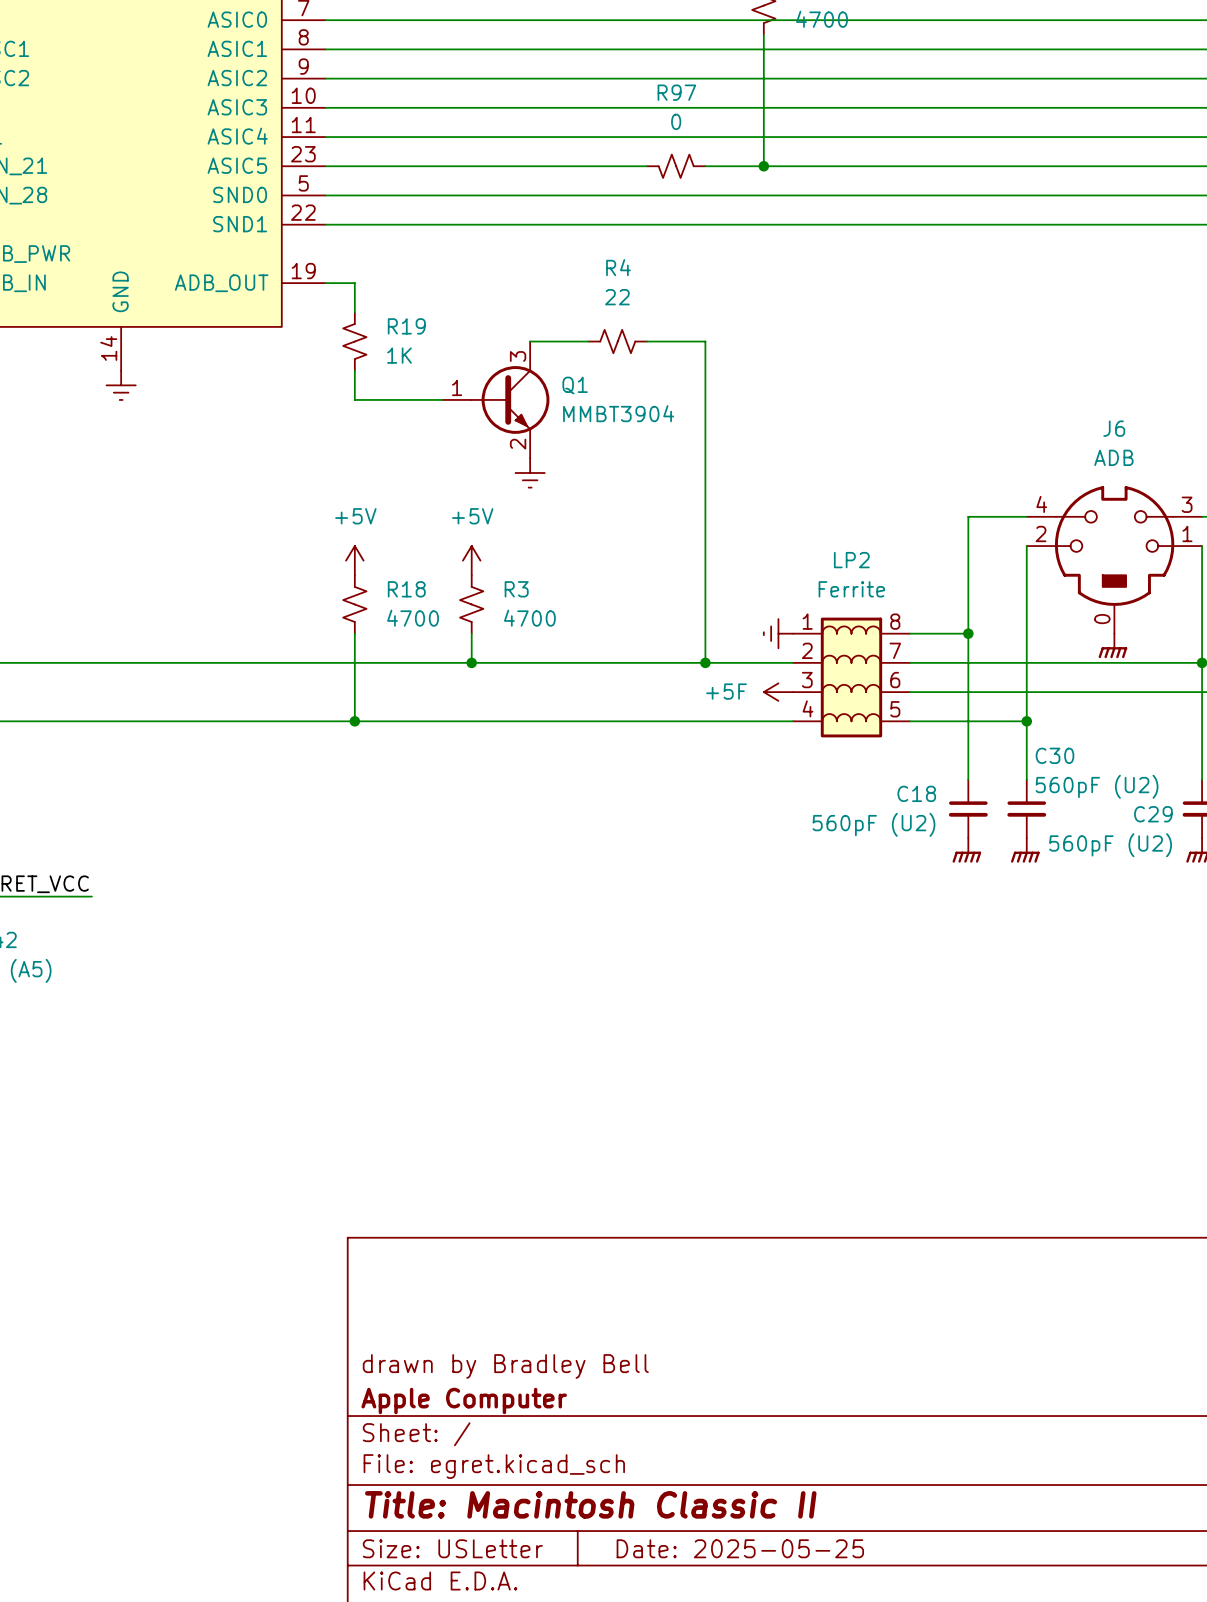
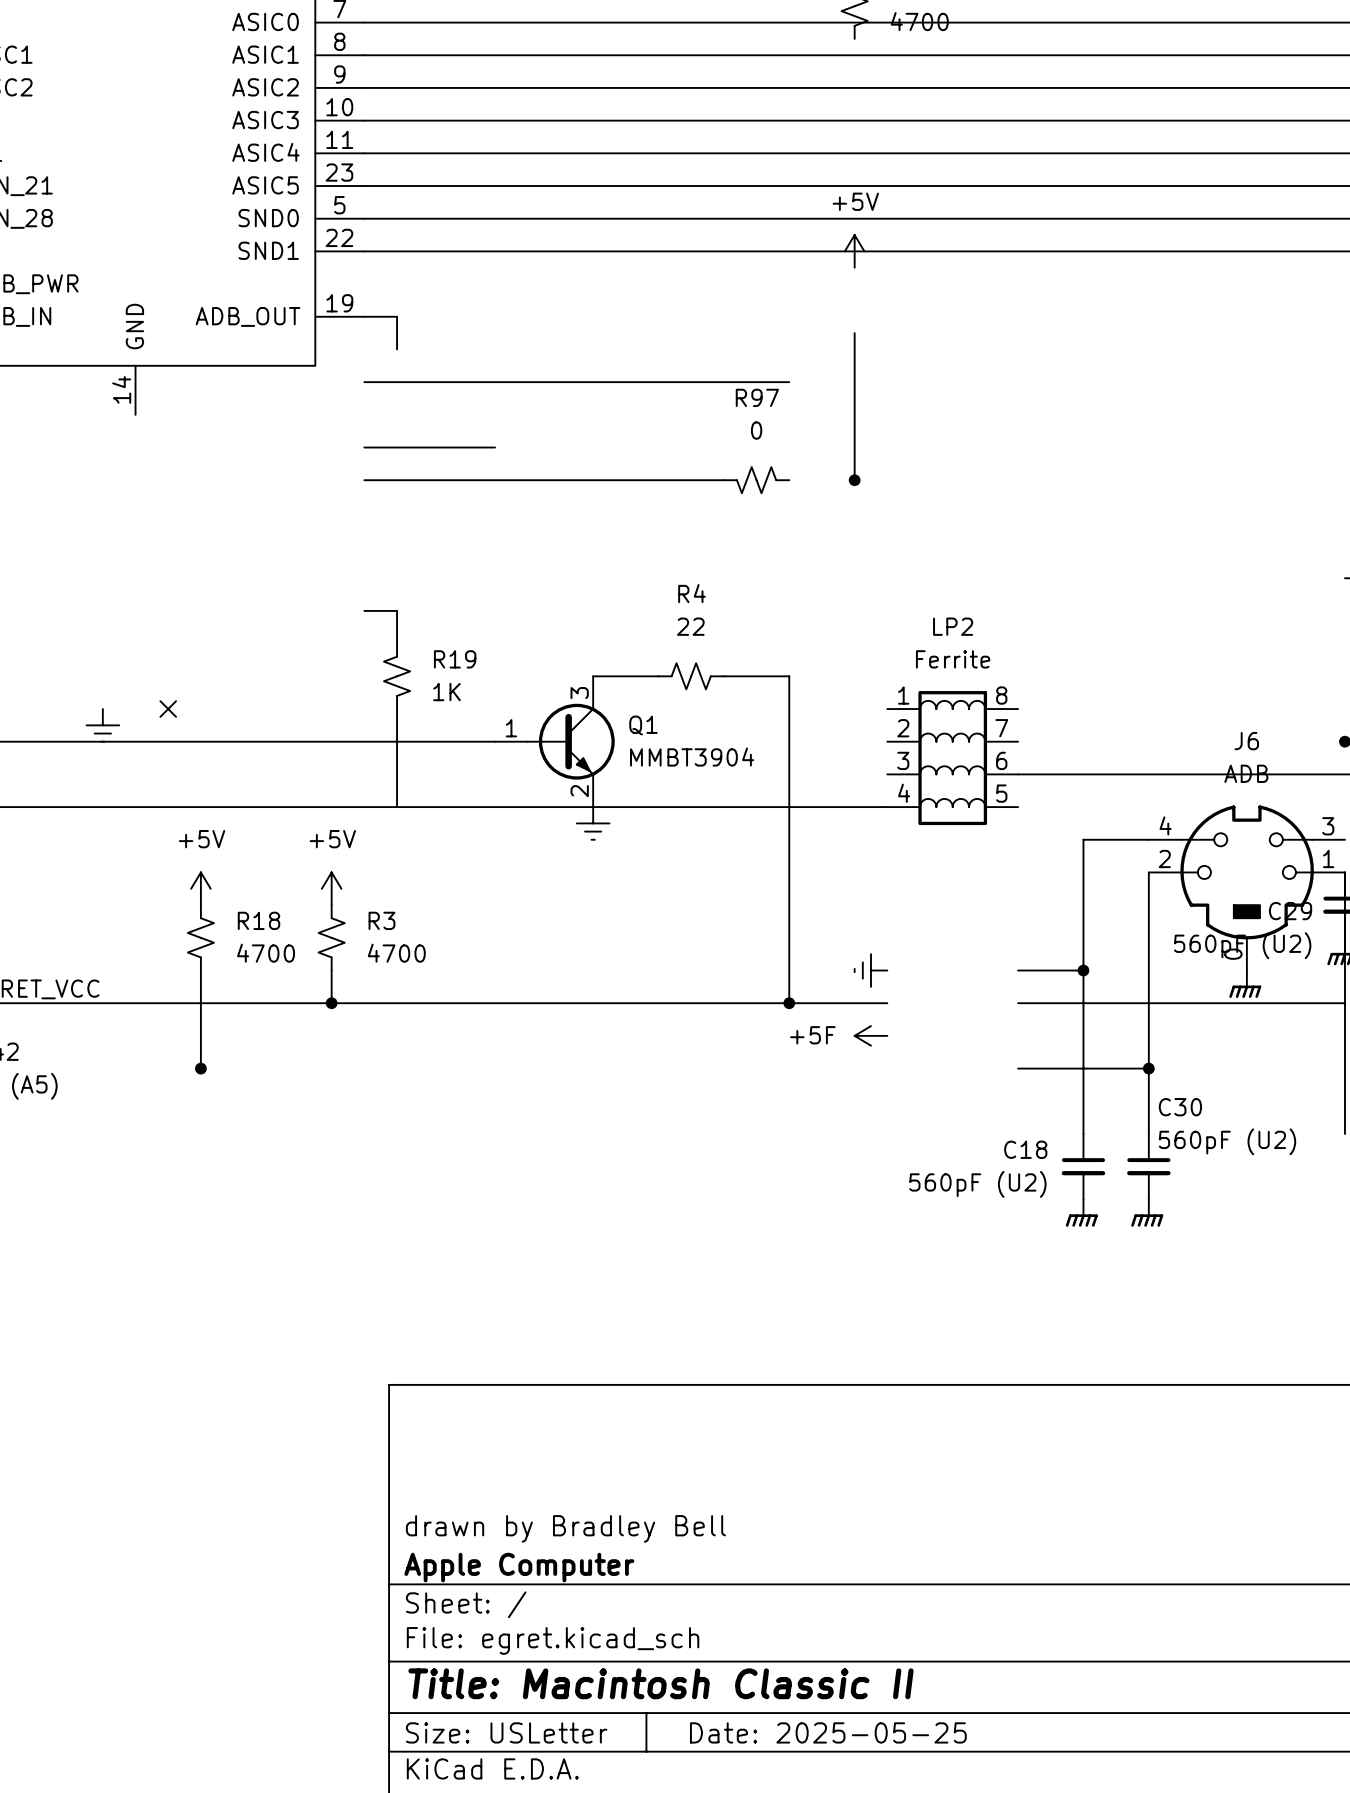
wire: (763, 34) (763, 166) -> (854, 333) (854, 480)
R97 position: (676, 166) -> (756, 480)
junction: (763, 166) -> none
power symbol: none -> +5V (854, 251)
wire: none -> (364, 382) (593, 382)
R19 position: (354, 341) -> (397, 676)
R4 position: (617, 341) -> (691, 676)
wire: (705, 341) (705, 604) -> (723, 676) (789, 676)
wire: (354, 370) (354, 399) -> (364, 447) (397, 447)
power symbol: (121, 385) -> none
Q1 position: (495, 399) -> (554, 741)
wire: none -> (364, 480) (723, 480)
junction: none -> (854, 480)
power symbol: (530, 473) -> none
wire: (1026, 516) (968, 516) (968, 750) -> (1148, 839) (1083, 839)
wire: none -> (364, 610) (397, 610) (397, 643)
wire: (1026, 546) (1026, 779) -> (1148, 1133) (1148, 872)
wire: (1202, 546) (1202, 779) -> (1344, 1133) (1344, 872)
J6 position: (1114, 559) -> (1246, 887)
power symbol: +5V (354, 560) -> none
power symbol: +5V (471, 560) -> none
R18 position: (354, 604) -> (200, 937)
R3 position: (471, 604) -> (331, 937)
wire: none -> (593, 676) (658, 676)
no-connect mark: none -> (168, 709)
wire: (471, 633) (471, 662) -> none
power symbol: (778, 633) -> none
wire: (909, 633) (968, 633) -> (1018, 970) (1083, 970)
junction: (968, 633) -> none
power symbol: (1112, 645) -> none
power symbol: none -> (102, 725)
wire: (442, 662) (793, 662) -> none
junction: (471, 662) -> none
wire: none -> (789, 741) (789, 1003)
junction: (705, 662) -> none
wire: (909, 662) (1202, 662) -> (1018, 1003) (1344, 1003)
power symbol position: +5F (778, 692) -> +5F (871, 1035)
junction: (354, 721) -> none
wire: (909, 721) (1026, 721) -> (1018, 1068) (1148, 1068)
junction: (1026, 721) -> none
power symbol: none -> (593, 823)
wire: none -> (1083, 872) (1083, 1133)
power symbol: none -> +5V (200, 888)
power symbol: none -> +5V (331, 888)
C18 position: (968, 808) -> (1083, 1166)
C30 position: (1026, 808) -> (1148, 1166)
power symbol: (966, 850) -> none
power symbol: (1025, 850) -> none
wire: none -> (200, 970) (200, 1068)
wire: none -> (331, 970) (331, 1003)
power symbol: none -> (871, 970)
junction: none -> (1083, 970)
power symbol: none -> (1245, 984)
wire: none -> (102, 1003) (887, 1003)
junction: none -> (331, 1003)
junction: none -> (789, 1003)
junction: none -> (200, 1068)
junction: none -> (1148, 1068)
power symbol: none -> (1081, 1213)
power symbol: none -> (1147, 1213)

